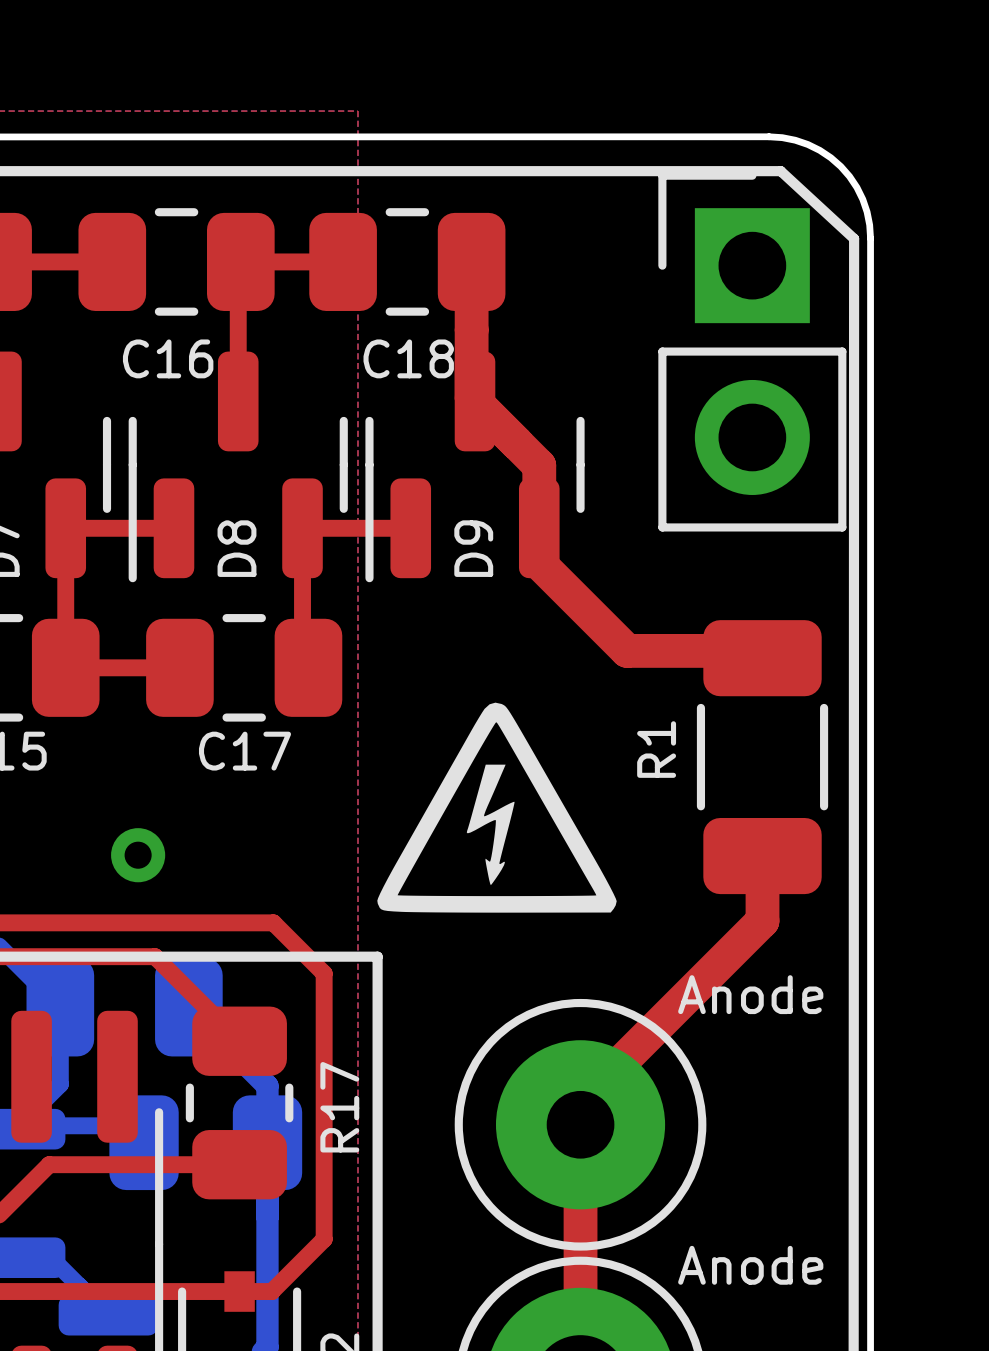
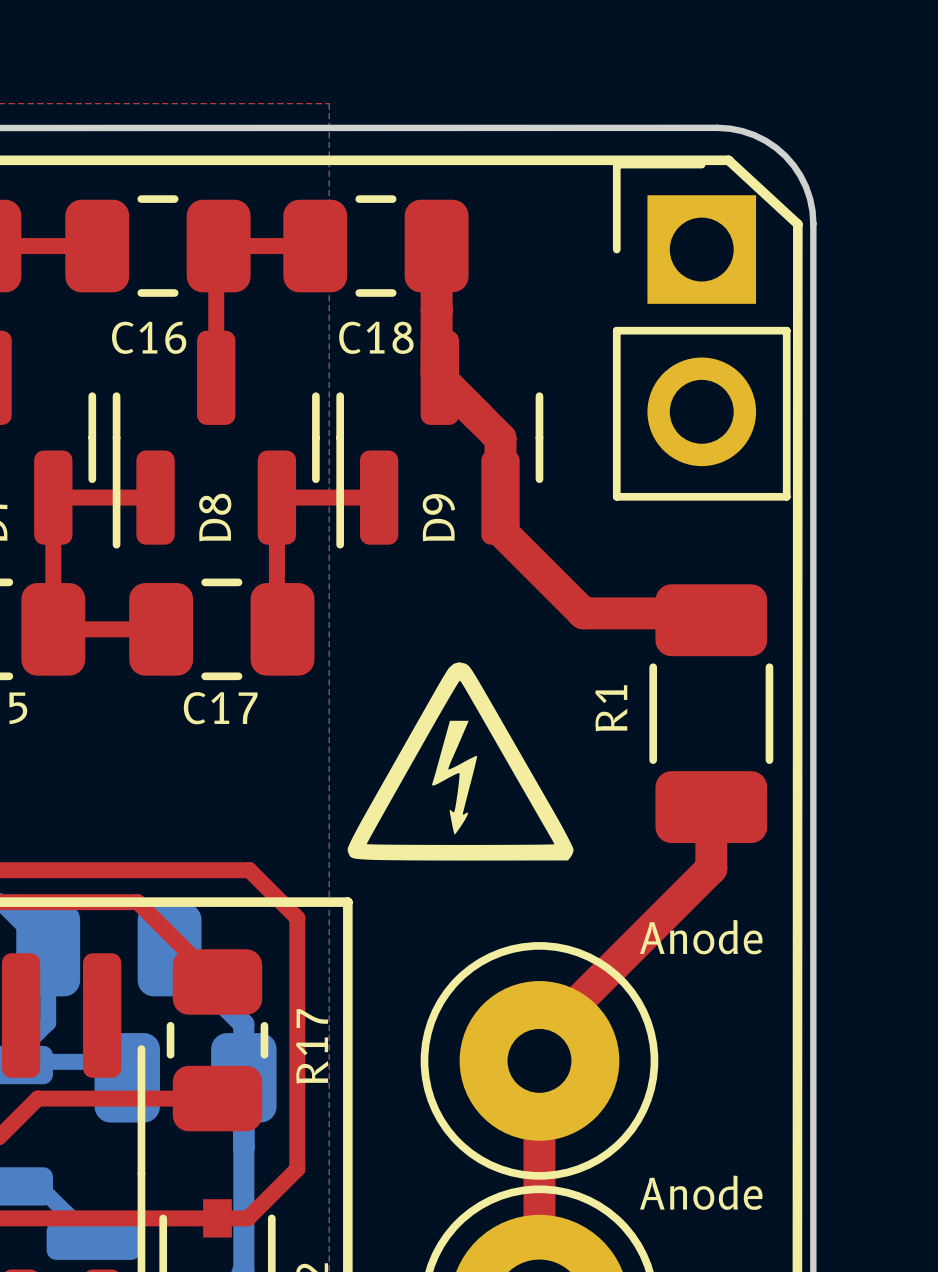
via: (138, 855) -> none

